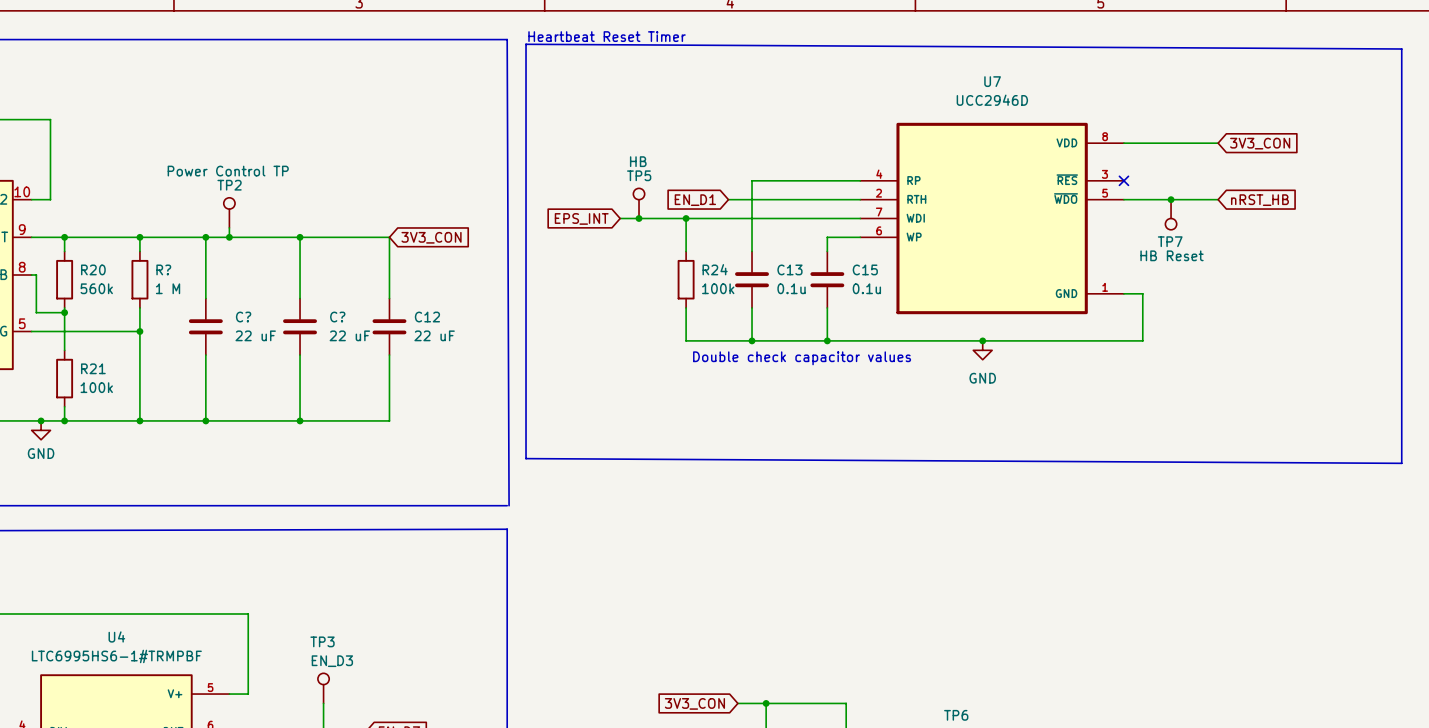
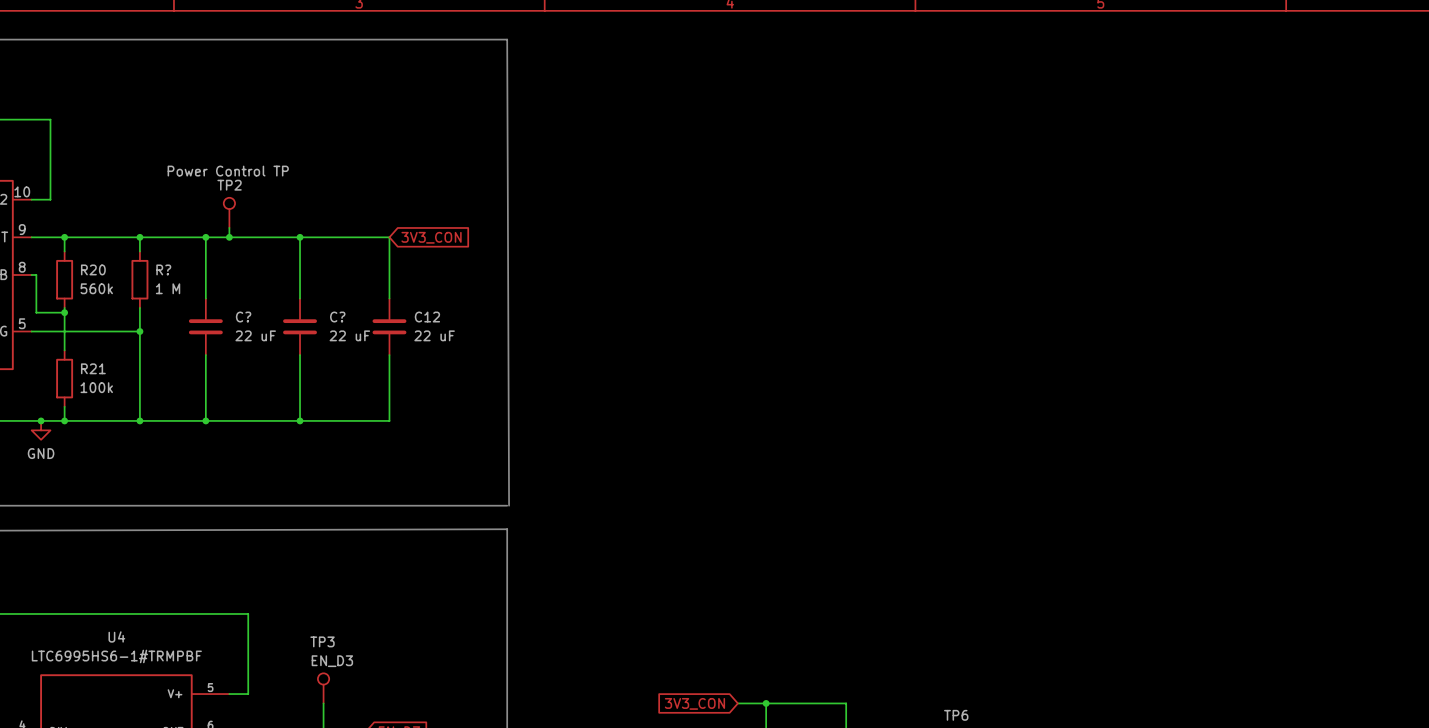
text: Heartbeat Reset Timer (607, 36) -> none
line: (526, 44) (526, 458) (1401, 463) (1401, 49) (526, 44) -> none
wire: (1123, 143) (1218, 143) -> none
global label: 3V3_CON (1260, 143) -> none
wire: (860, 180) (752, 180) (752, 251) -> none
no-connect mark: (1123, 180) -> none
wire: (728, 199) (860, 199) -> none
wire: (1123, 199) (1218, 199) -> none
junction: (1171, 199) -> none
global label: EN_D1 (695, 200) -> none
global label: nRST_HB (1259, 200) -> none
TP5: HB (639, 203) -> none
TP7: HB Reset (1171, 214) -> none
global label: EPS_INT (581, 218) -> none
wire: (620, 218) (860, 218) -> none
junction: (639, 218) -> none
wire: (686, 218) (686, 251) -> none
junction: (686, 218) -> none
U7: UCC2946D (992, 218) -> none
wire: (860, 237) (827, 237) (827, 251) -> none
R24: 100k (686, 279) -> none
C13: 0.1u (752, 279) -> none
C15: 0.1u (827, 279) -> none
wire: (1123, 293) (1142, 293) (1142, 340) (686, 340) (686, 307) -> none
wire: (752, 307) (752, 340) -> none
wire: (827, 307) (827, 340) -> none
junction: (752, 340) -> none
junction: (827, 340) -> none
junction: (982, 340) -> none
power symbol: GND (982, 350) -> none
text: Double check capacitor values (802, 358) -> none

